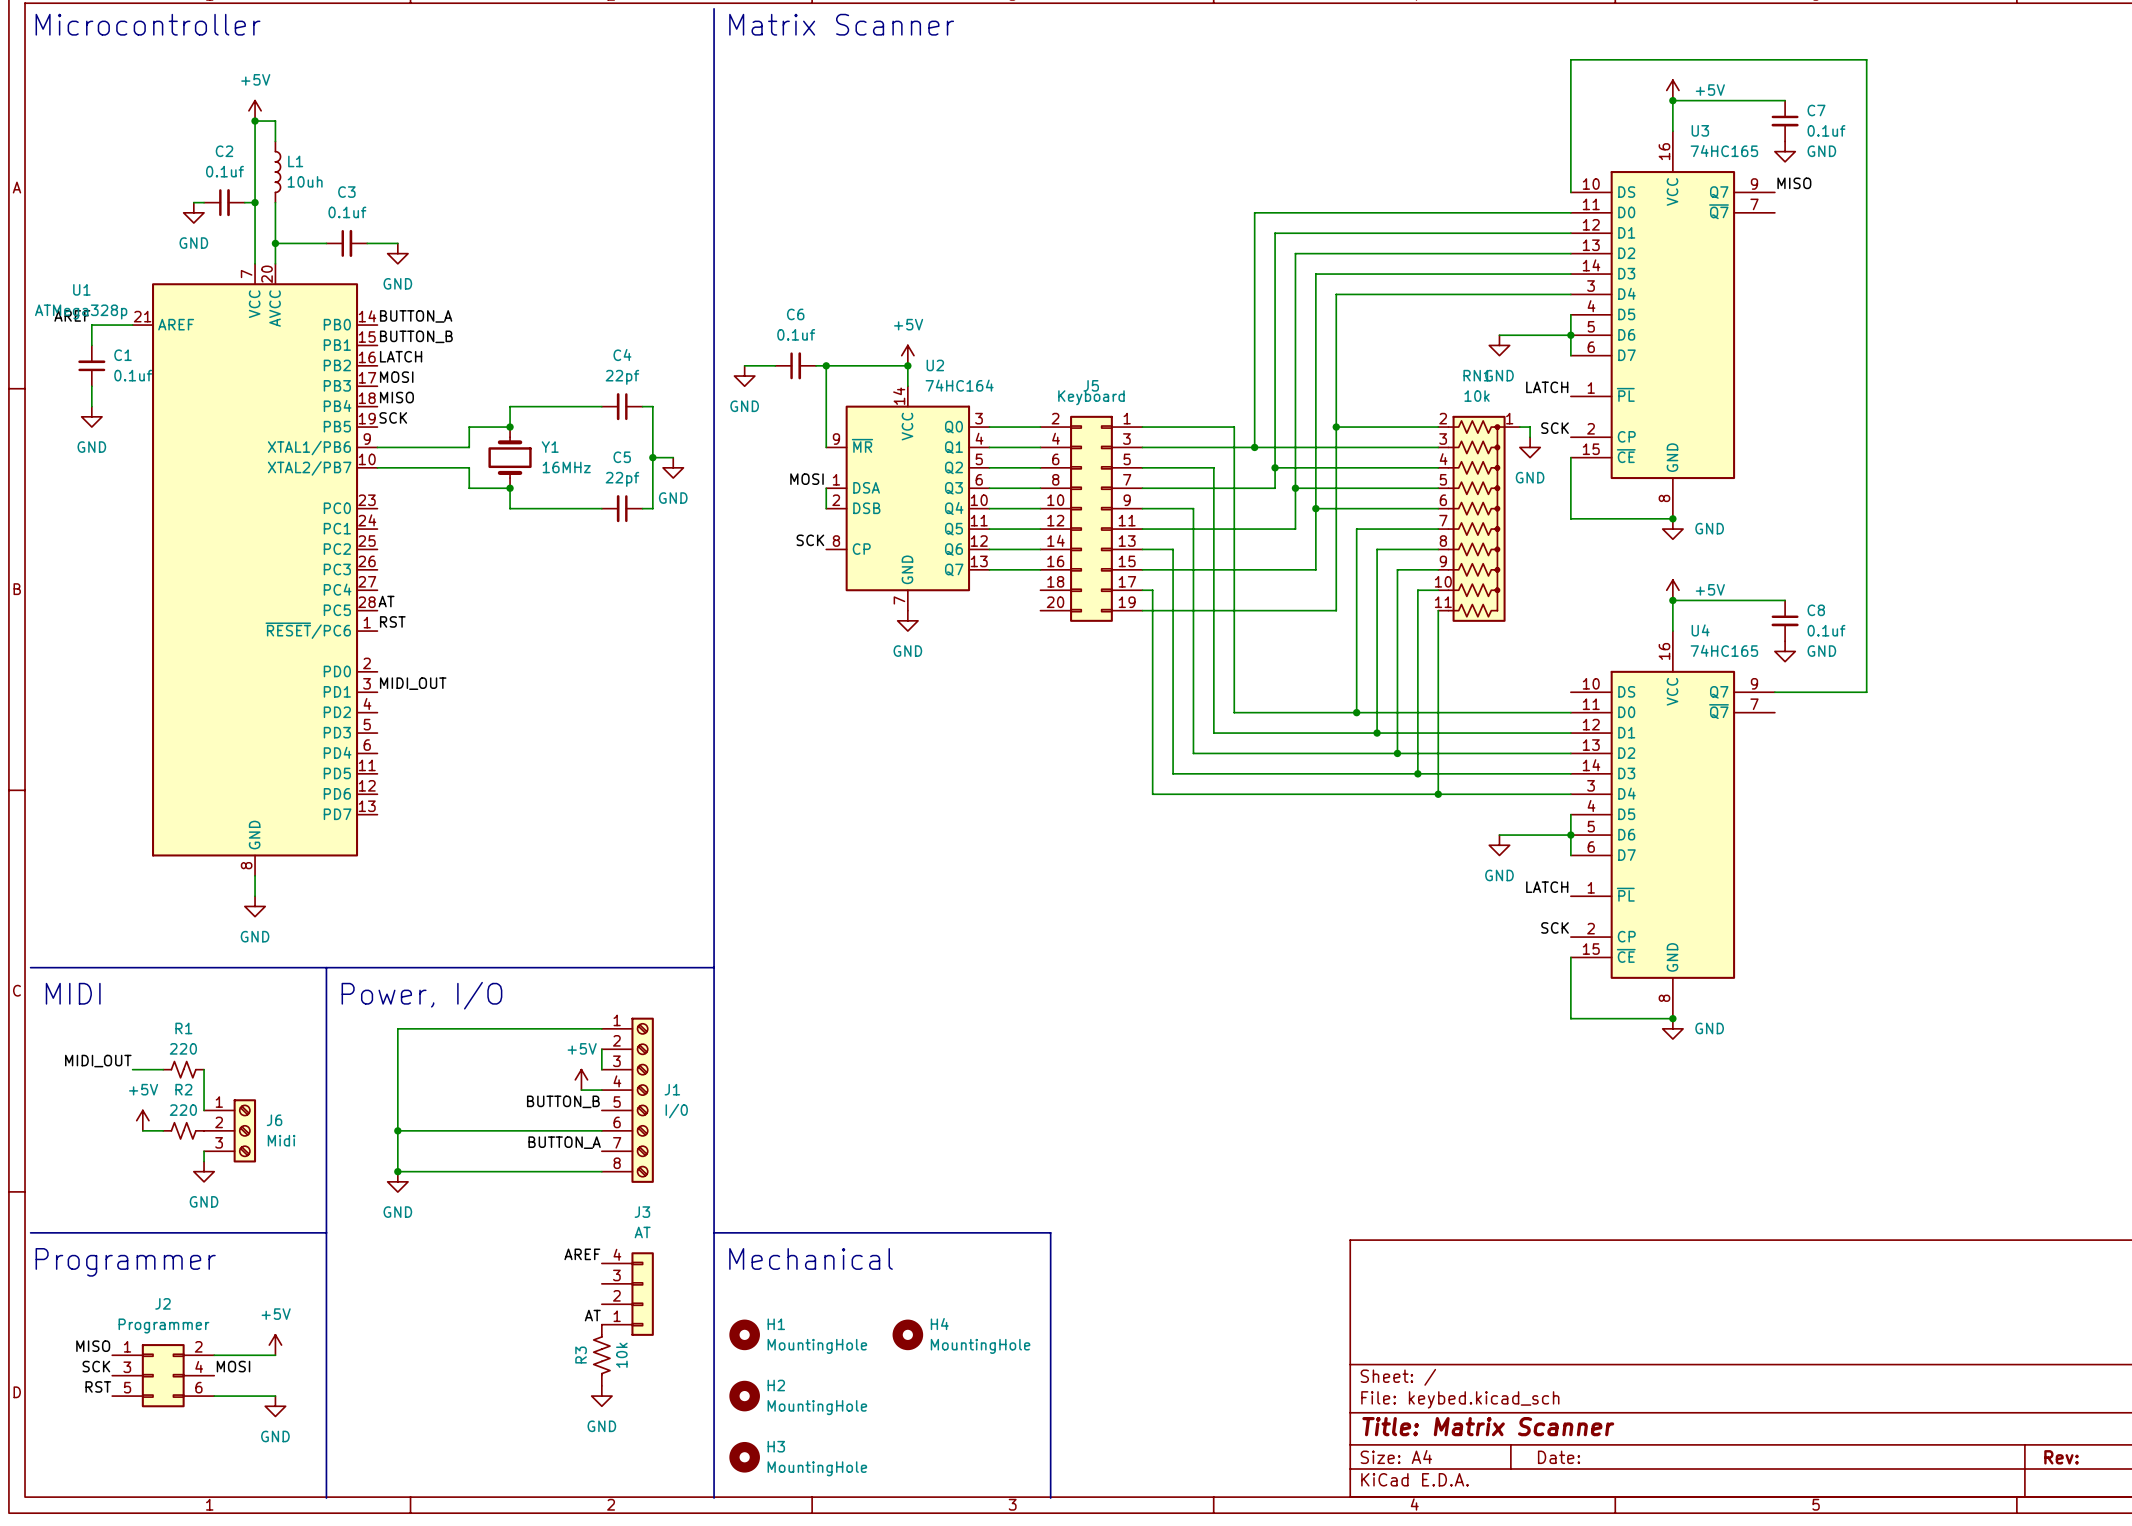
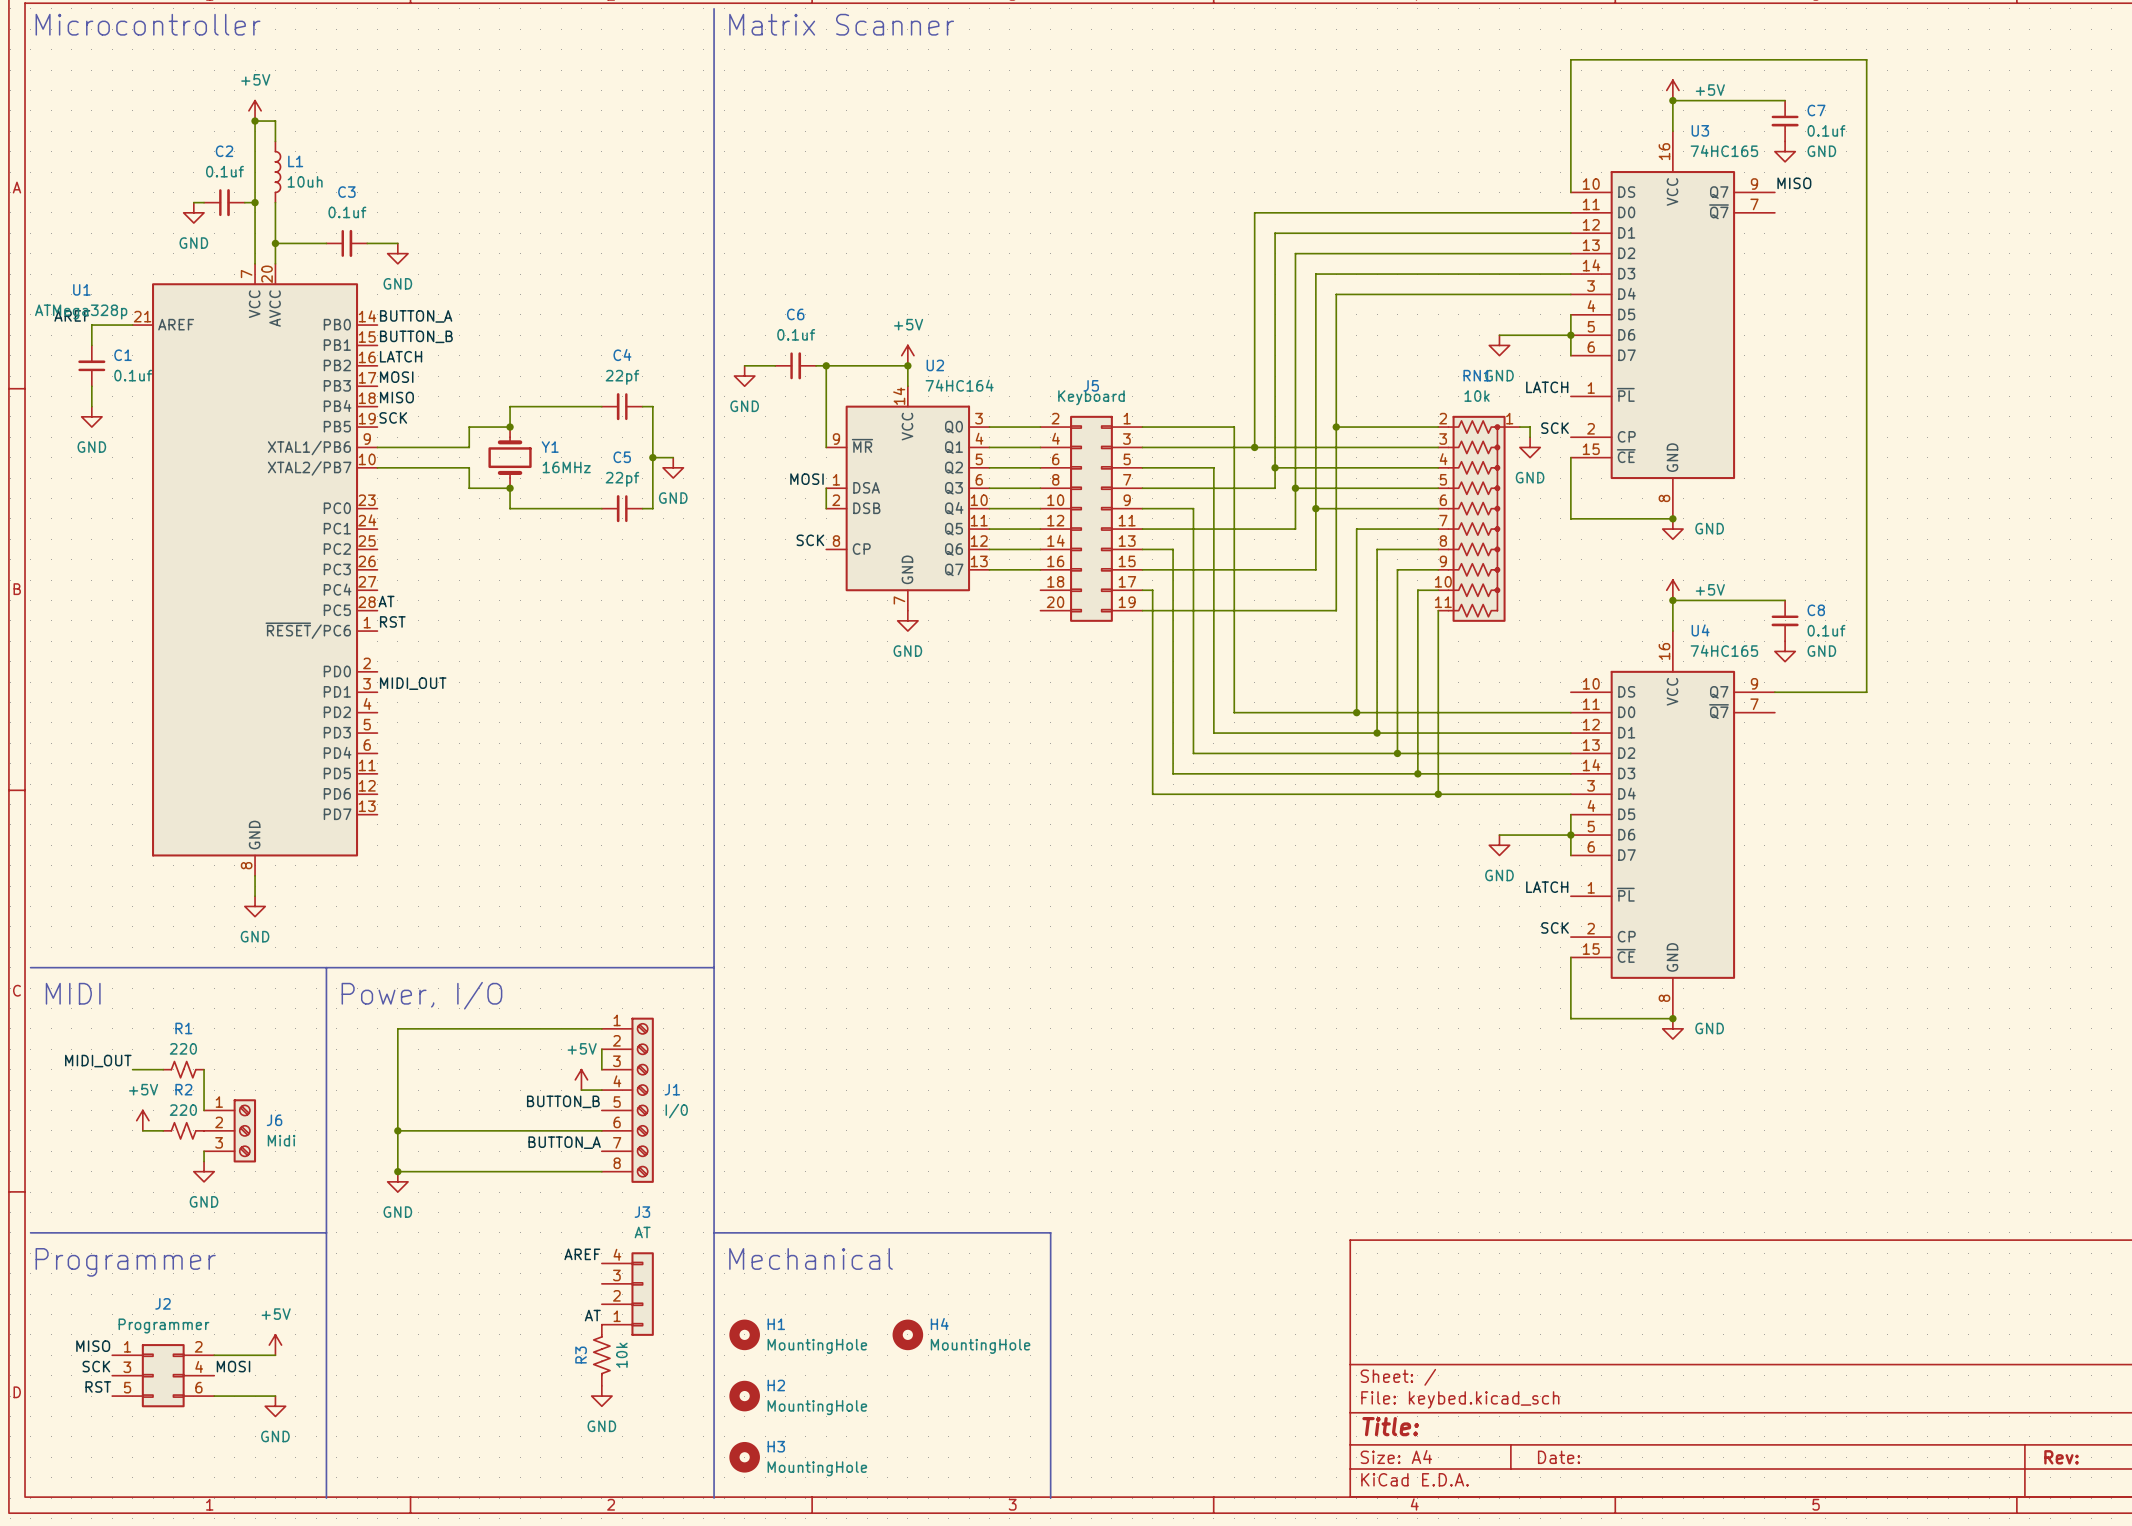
title block: Title: Matrix Scanner (1488, 1426) -> Title: (1390, 1426)

